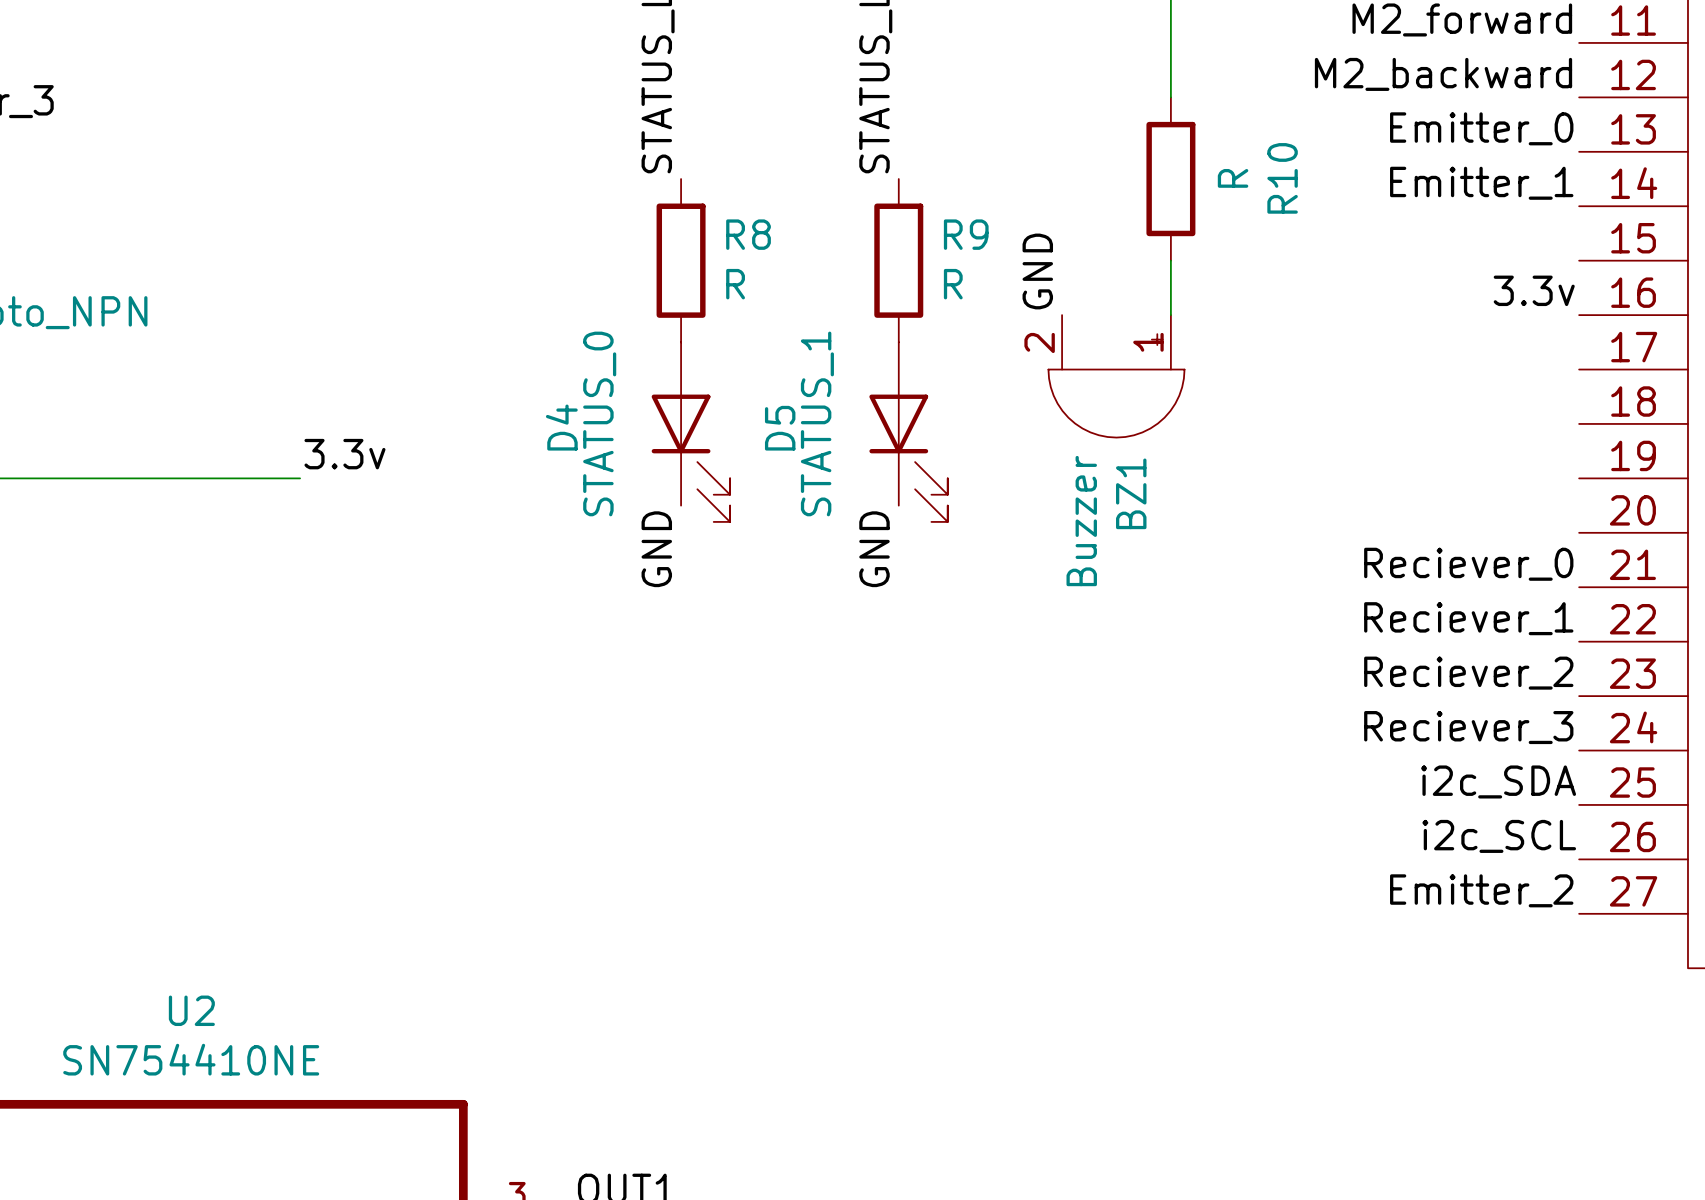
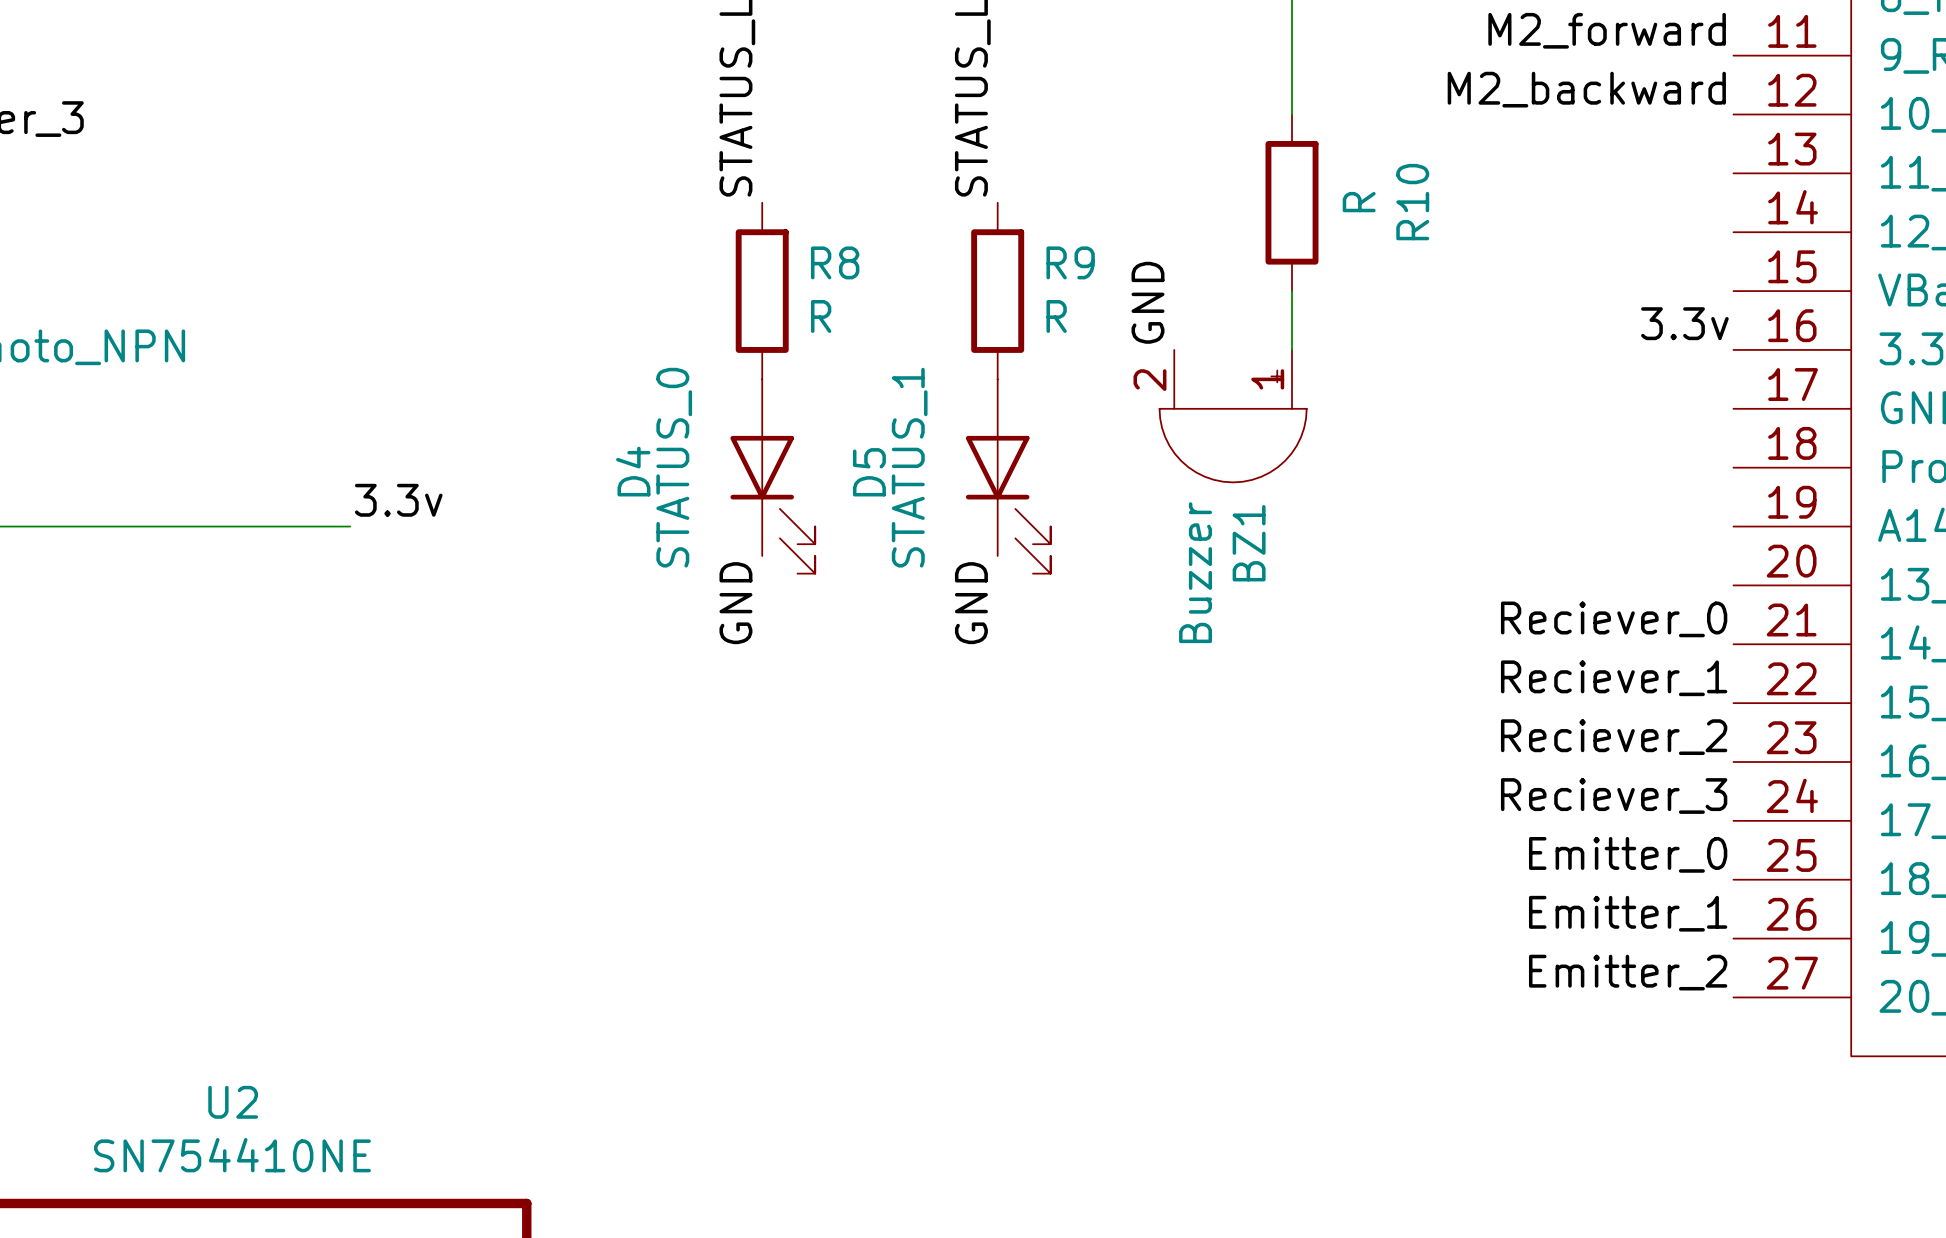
label: Emitter_0 (1481, 128) -> none
label: Emitter_1 (1481, 183) -> none
label: i2c_SDA (1498, 781) -> Emitter_0 (1628, 854)
label: i2c_SCL (1499, 836) -> Emitter_1 (1628, 913)

